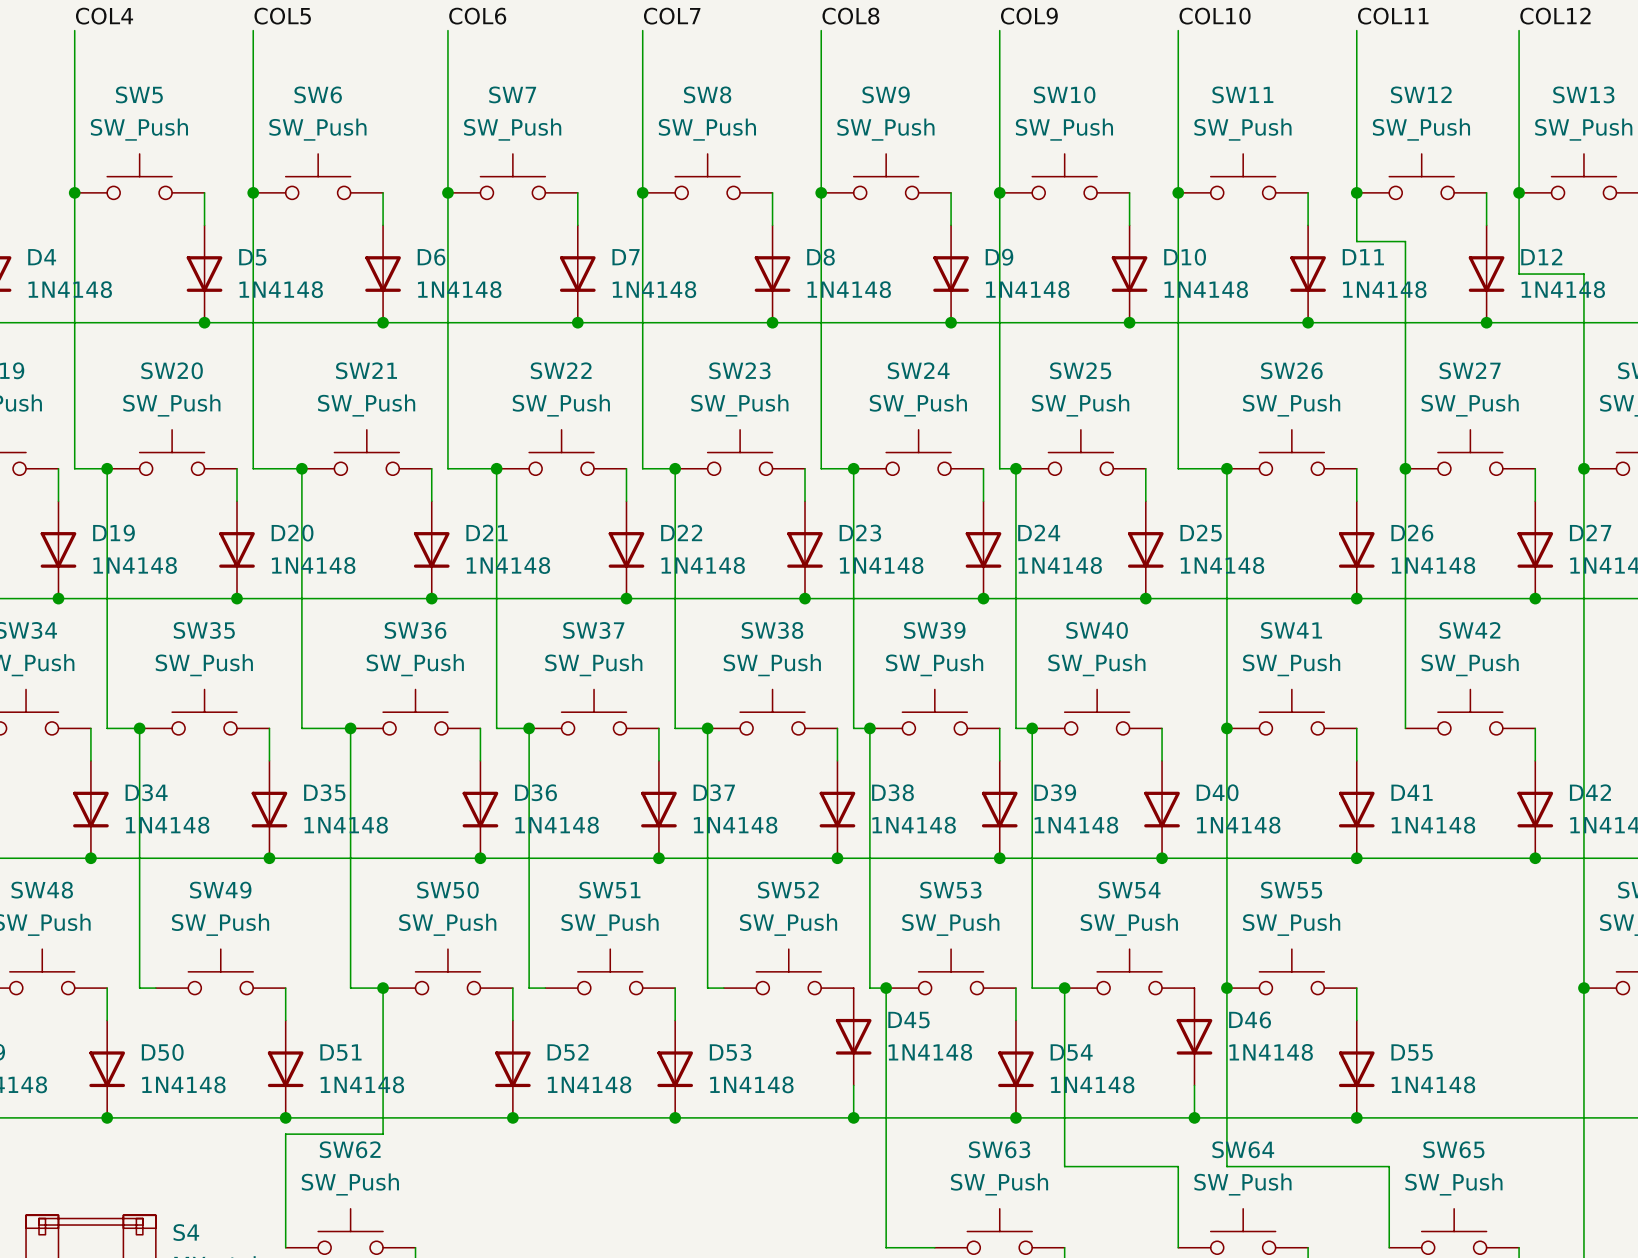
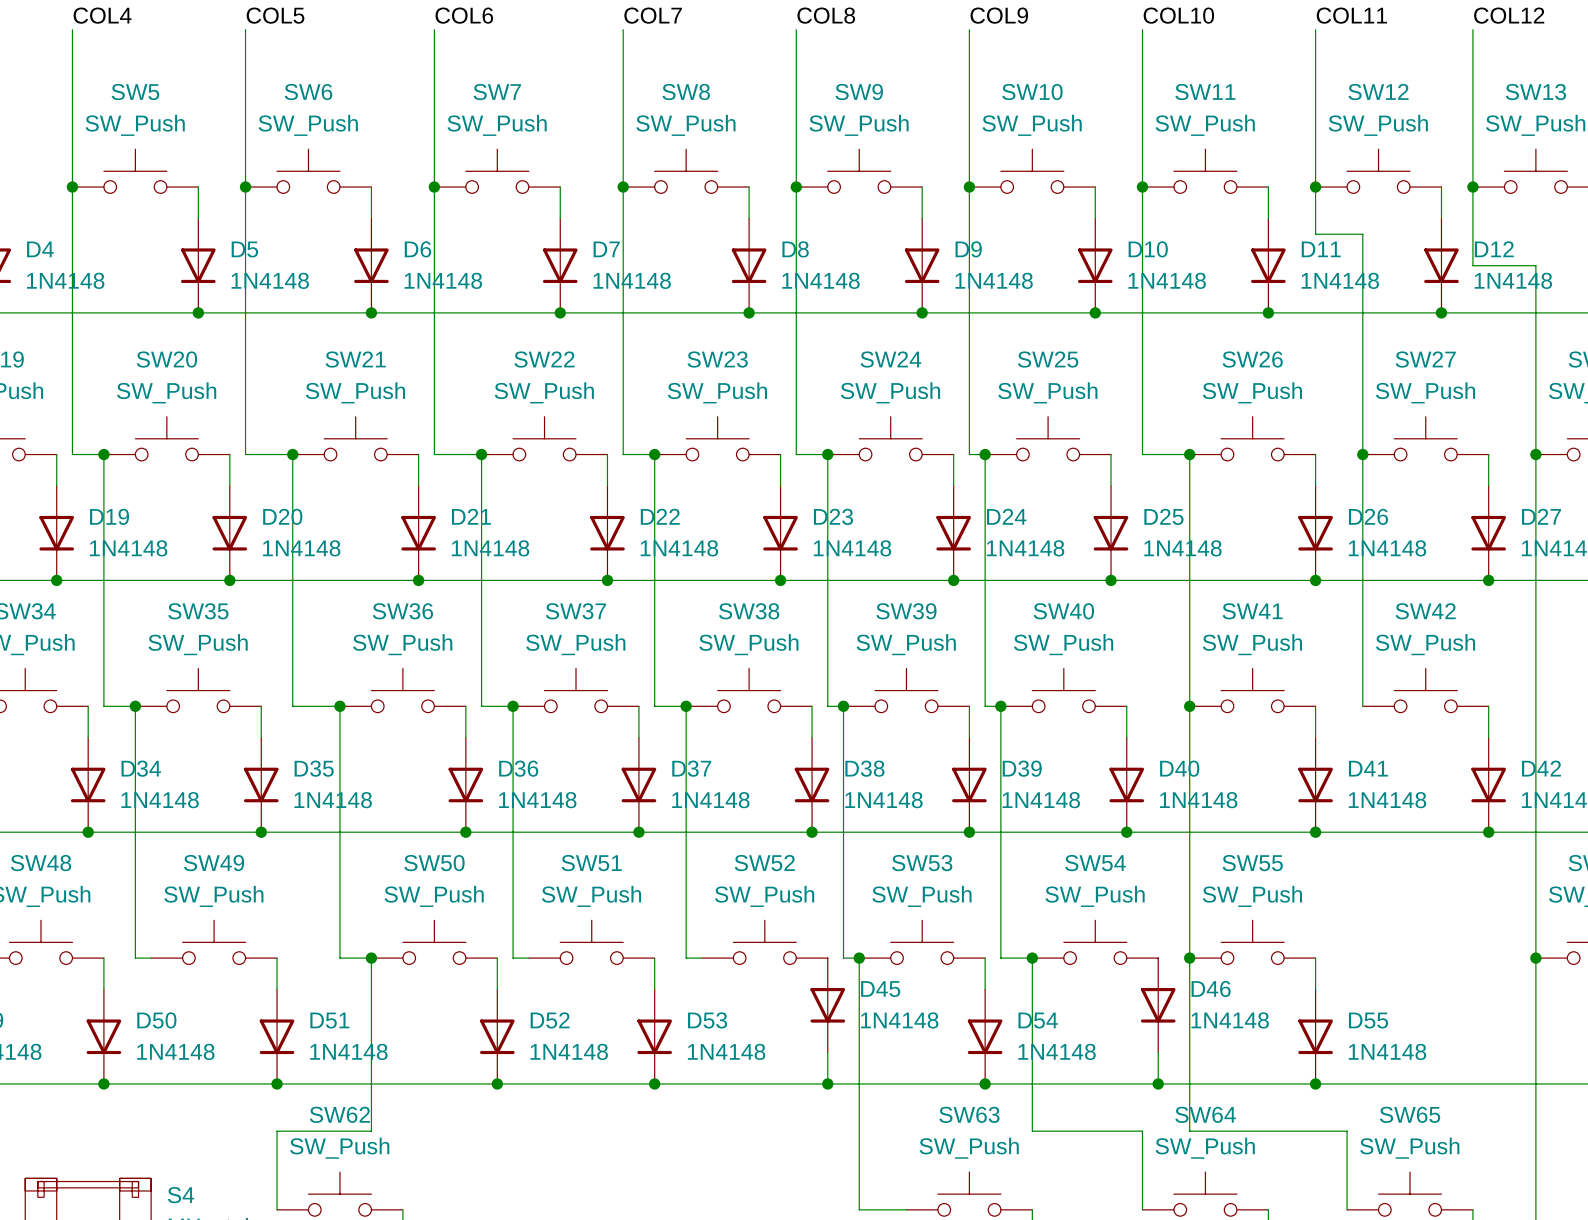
wire: (383, 1134) (285, 1134) (285, 1166) -> (371, 1099) (371, 1131) (277, 1131)

